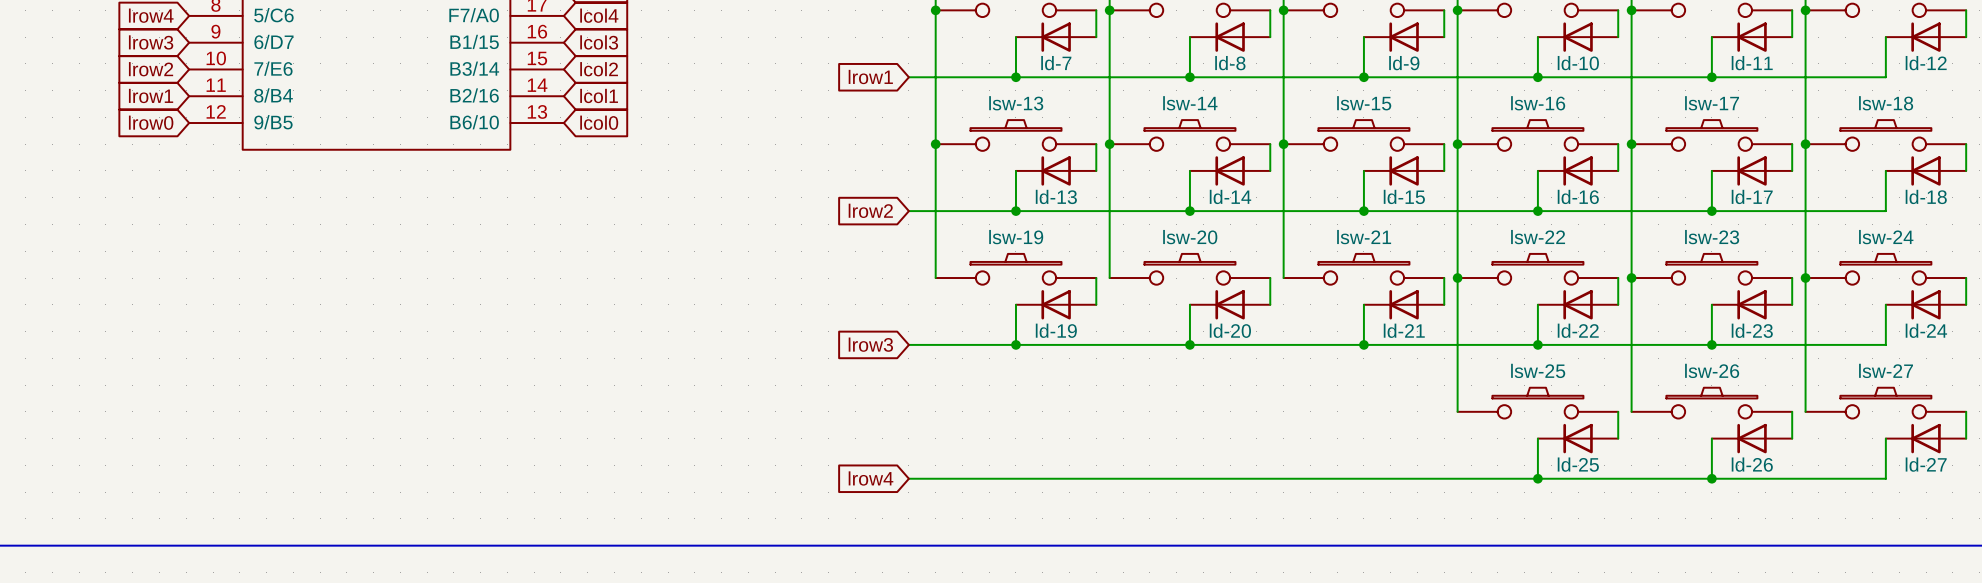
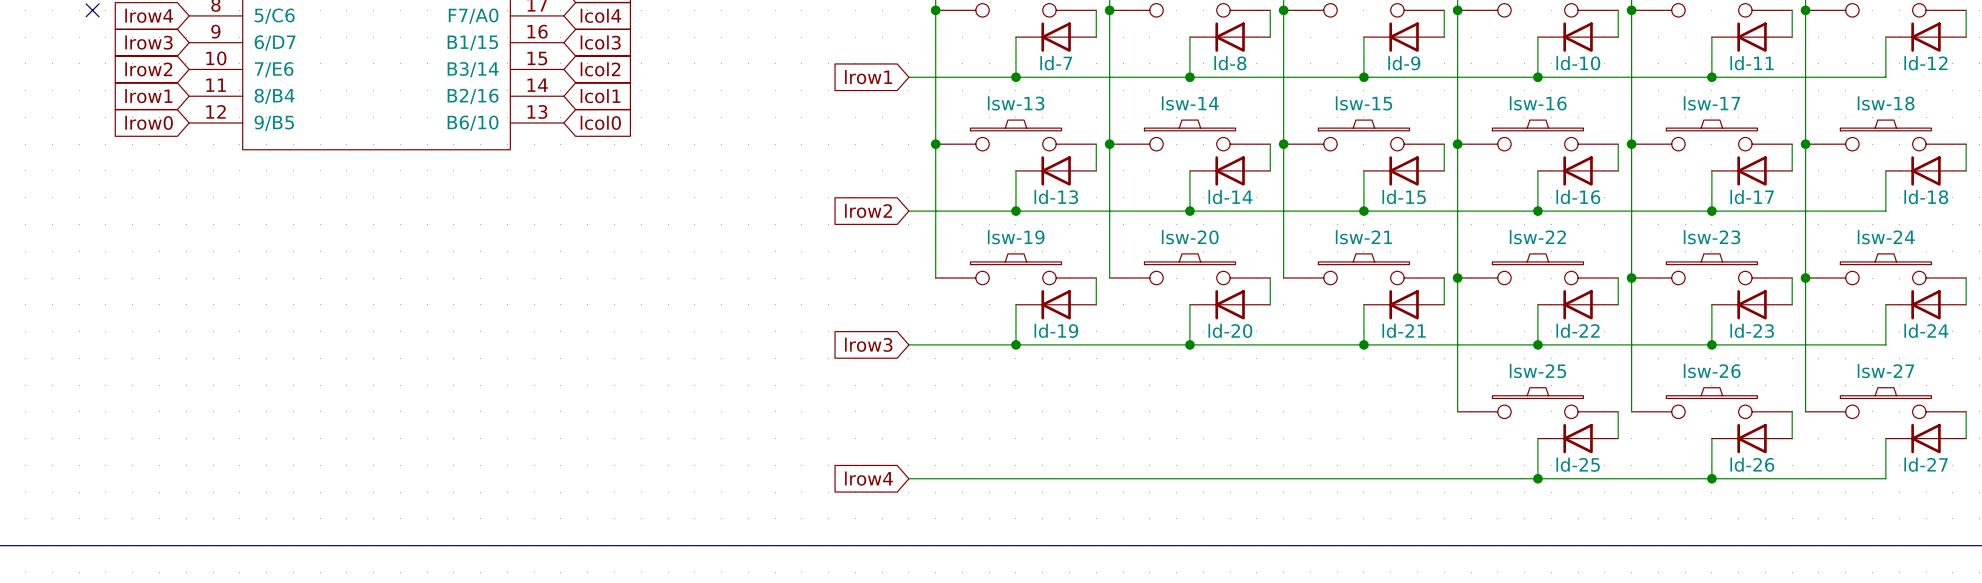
no-connect mark: none -> (92, 10)

